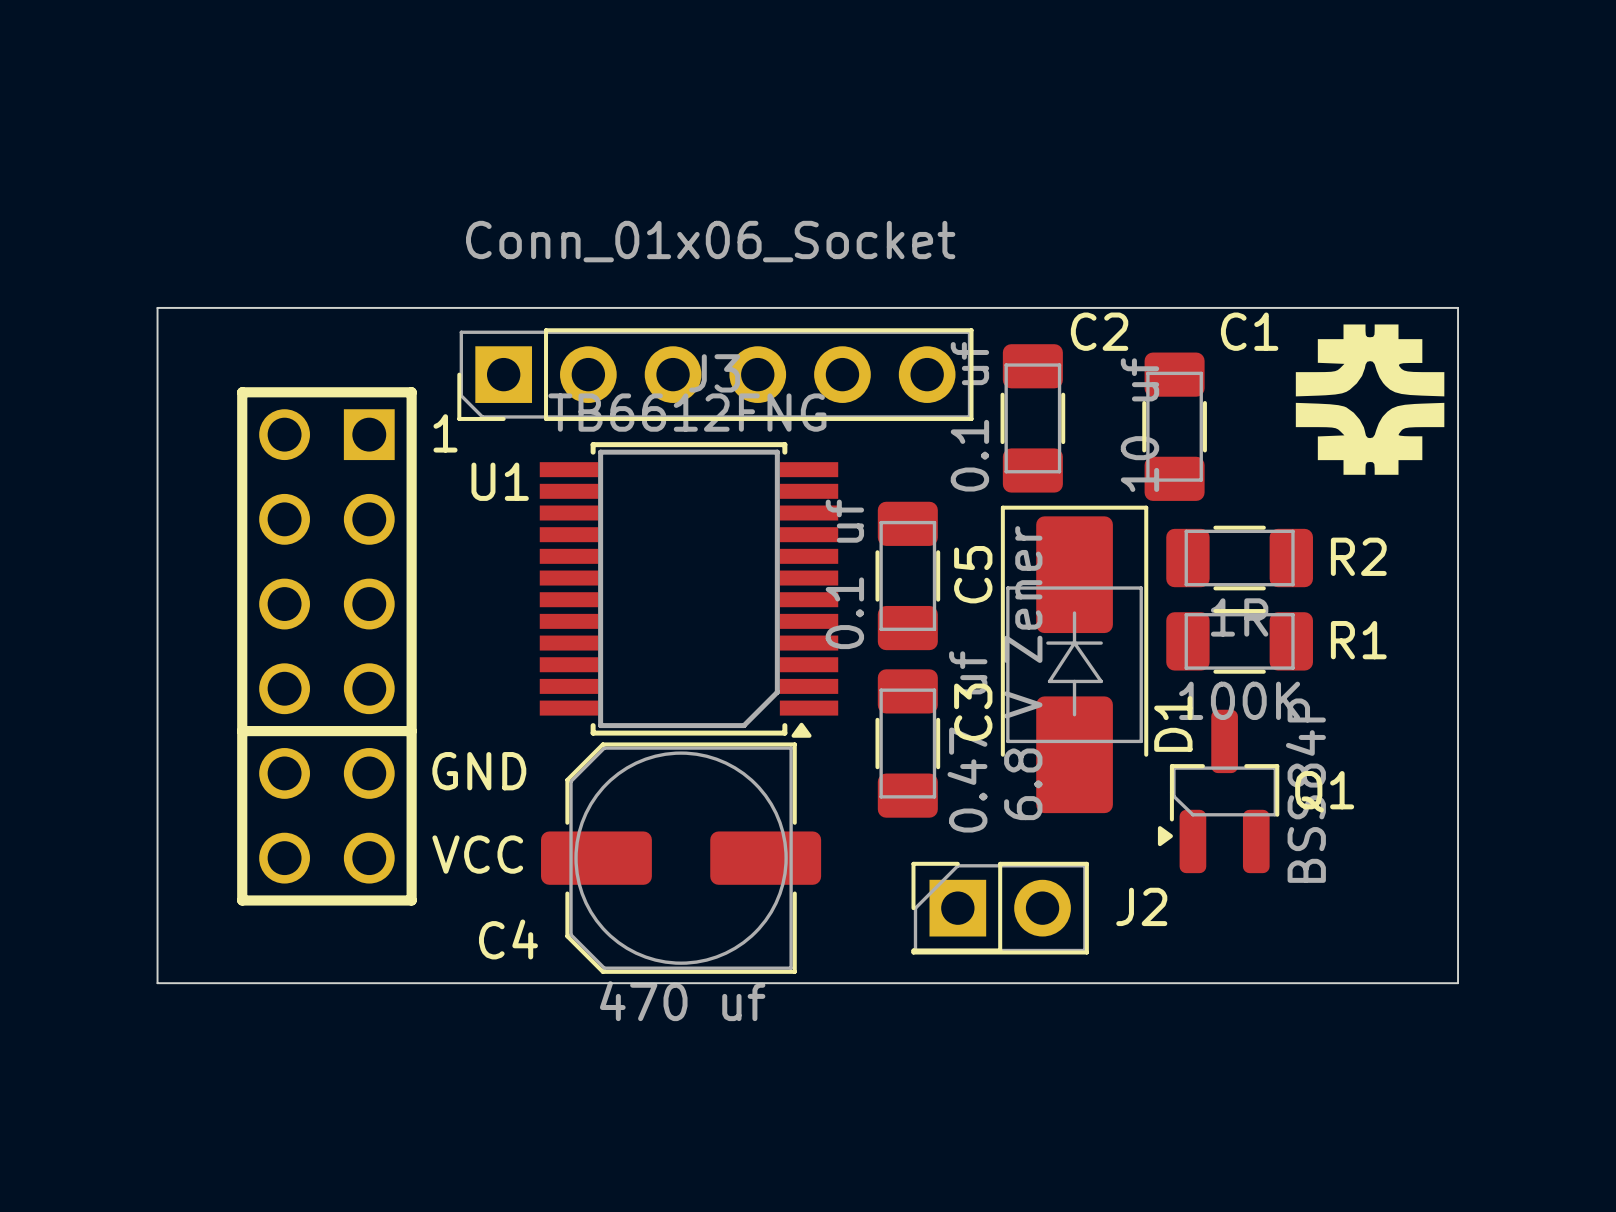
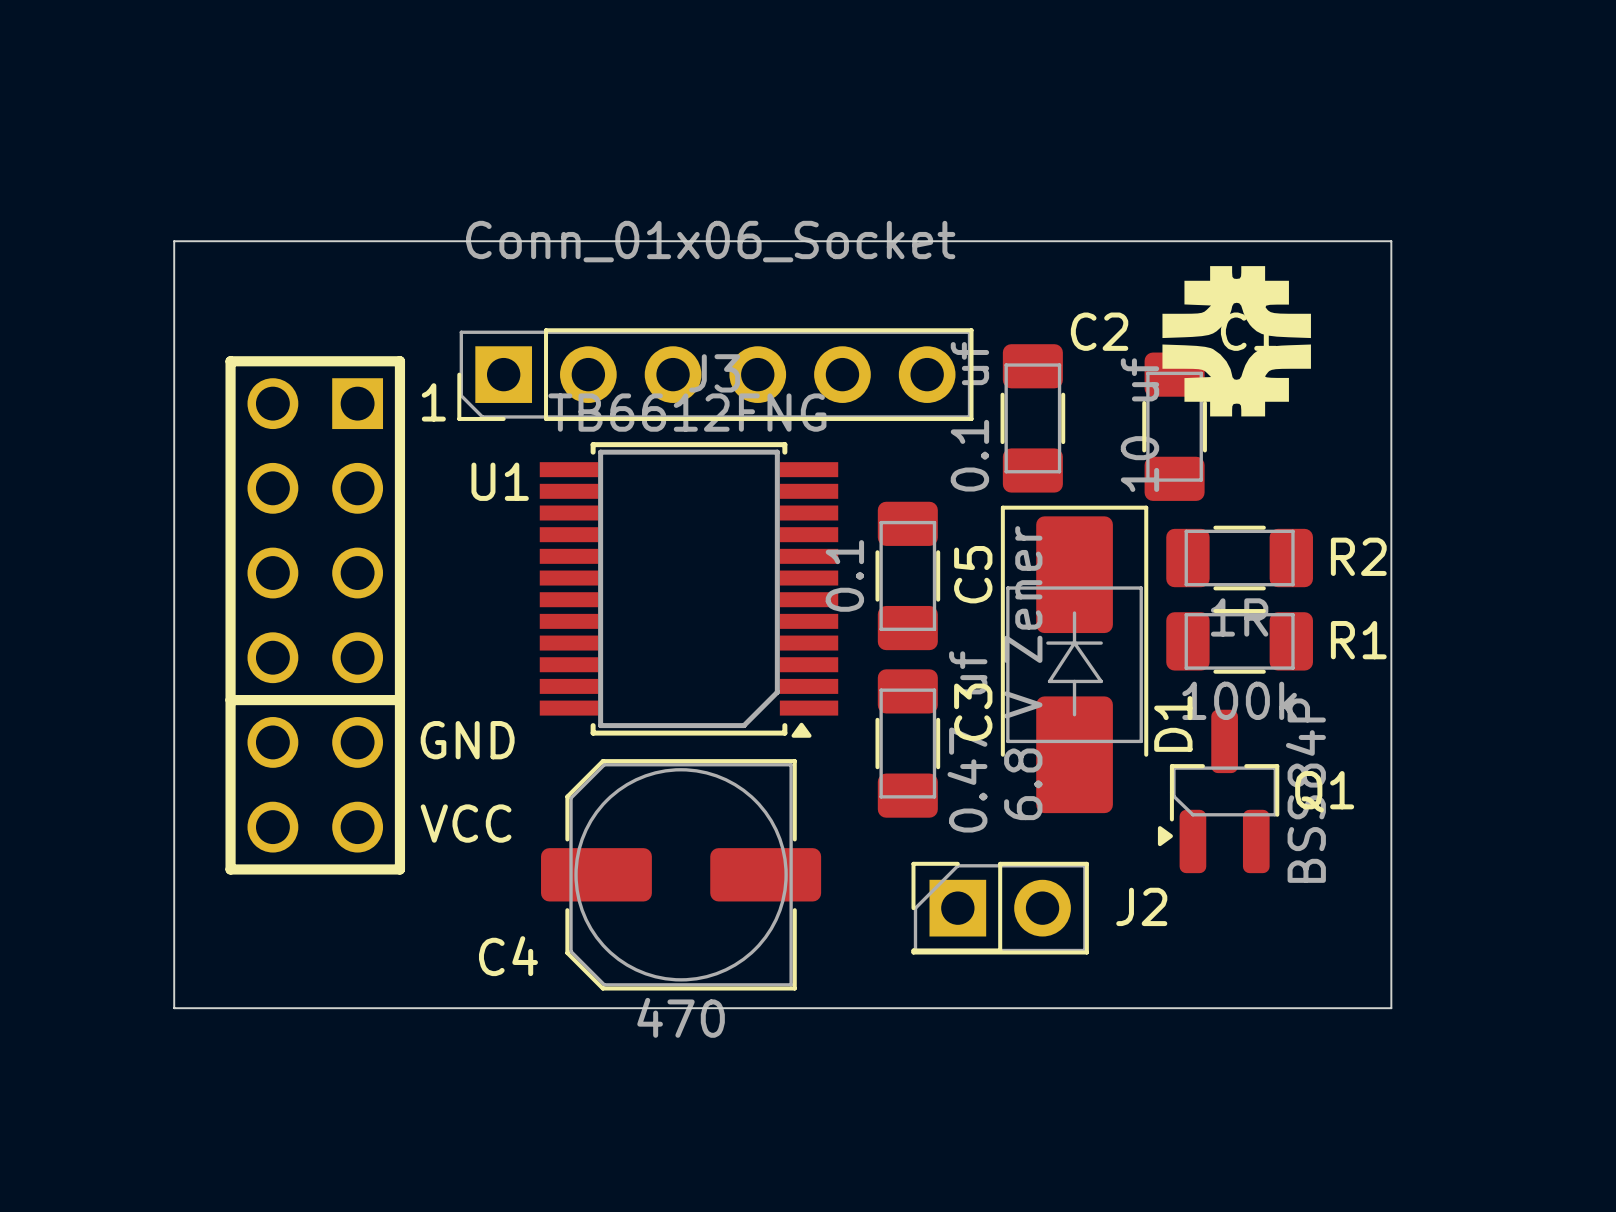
board edge: (157, 307) (1458, 307) (1458, 983) (157, 983) (157, 307) -> (174, 241) (174, 1008) (1391, 1008) (1391, 241) (174, 241)
drawing position: (1370, 399) -> (1236, 341)
C5 value: 0.1 uf (844, 574) -> 0.1 (844, 575)
part position: (326, 646) -> (315, 615)
R1 value: 100K (1239, 700) -> 100k (1239, 700)
C4 position: (681, 858) -> (681, 874)
C4 value: 470 uf (682, 1001) -> 470 (681, 1017)

